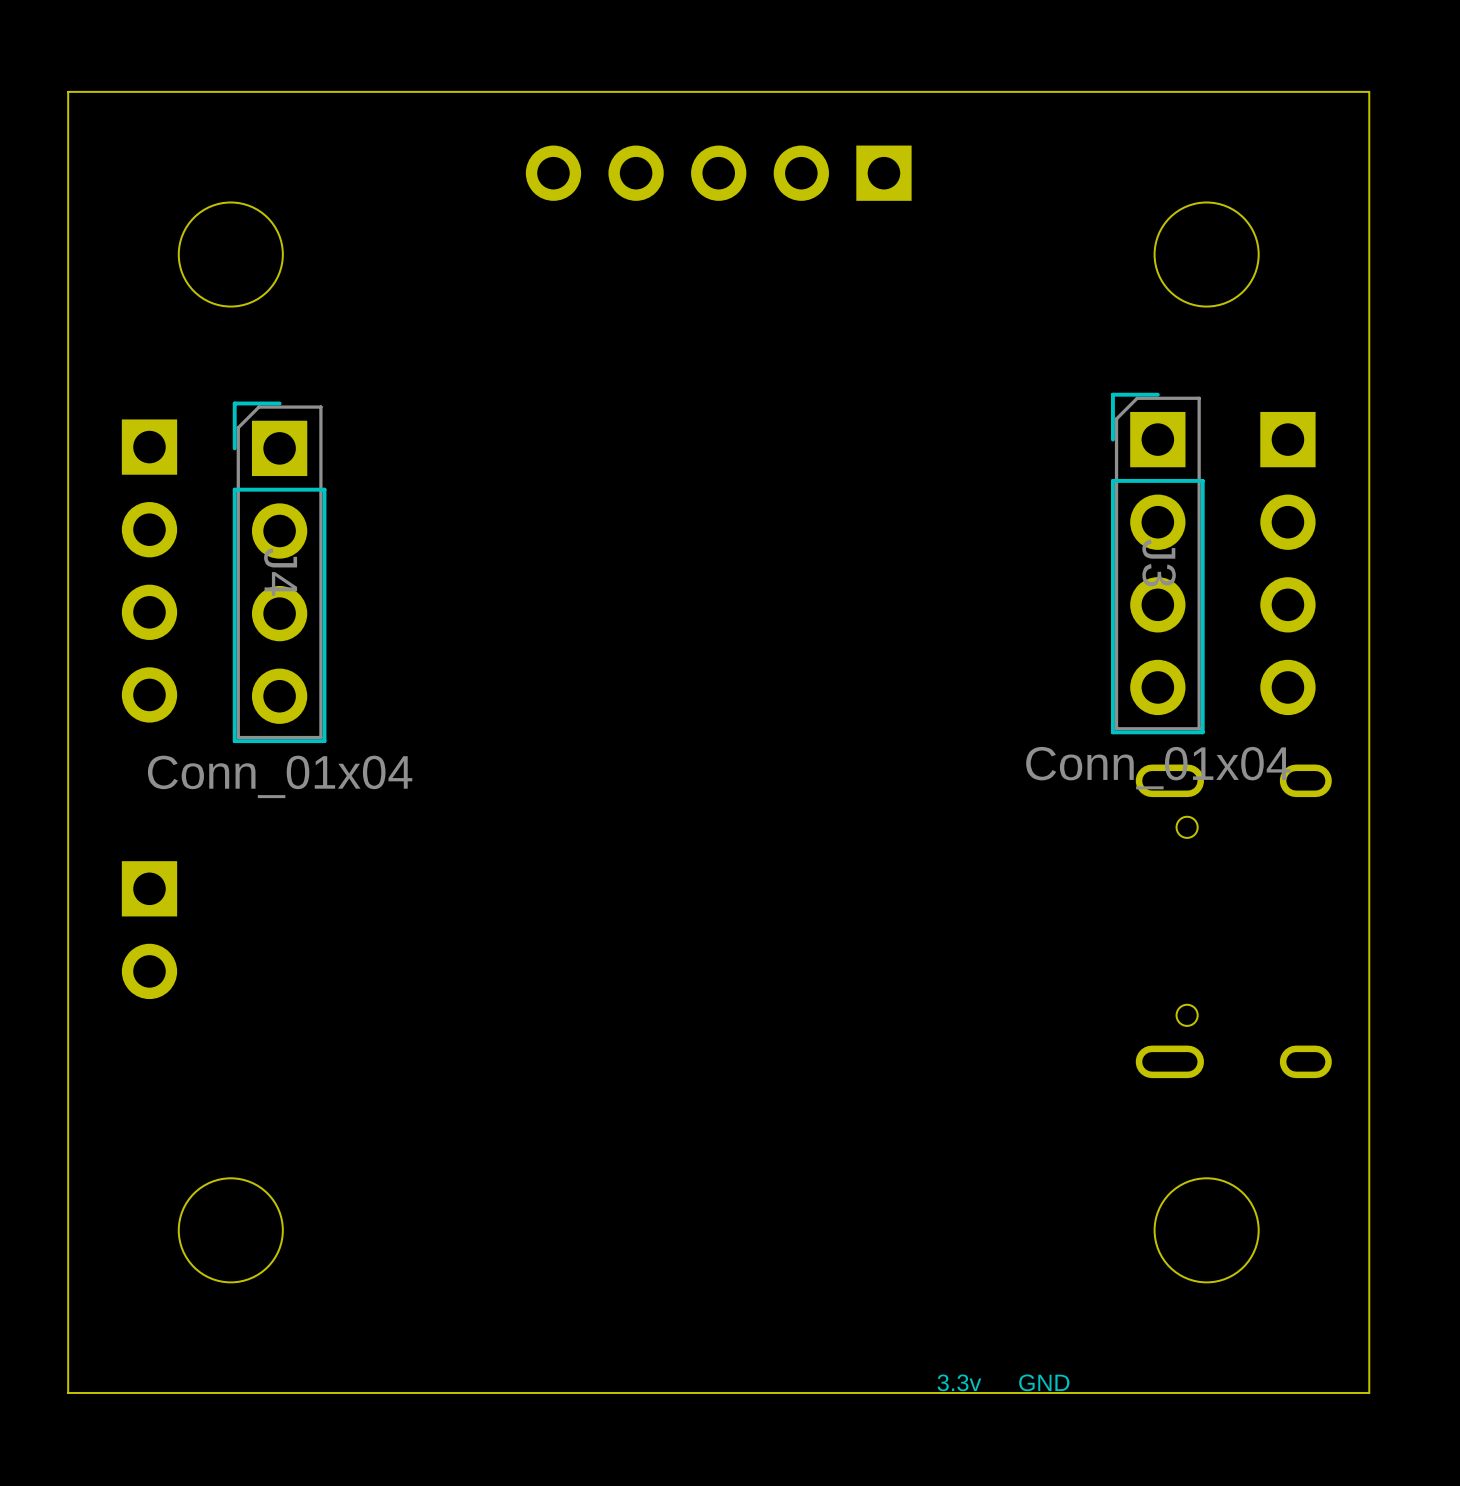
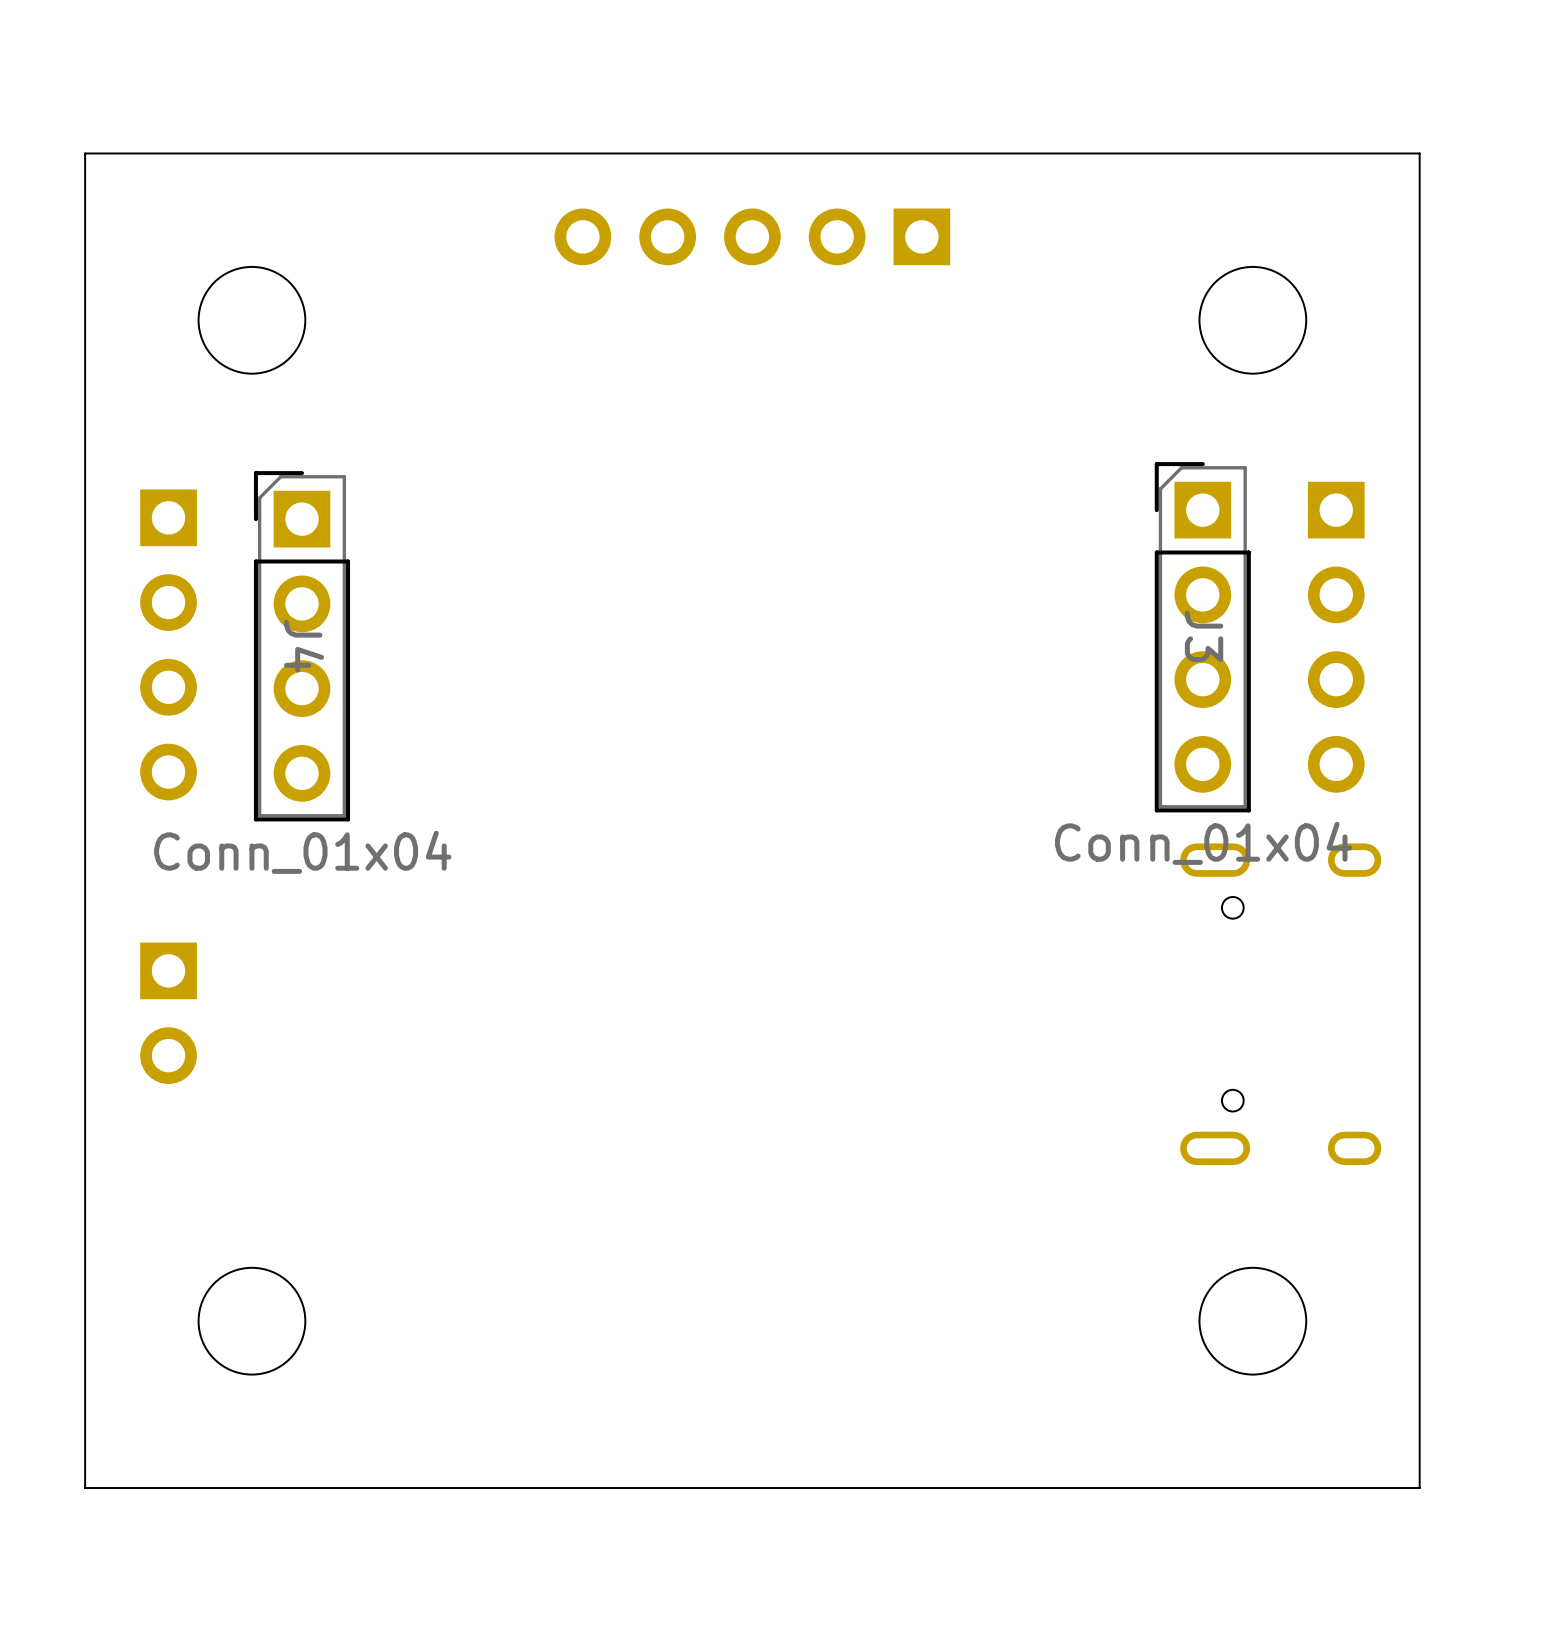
text: 3.3v (959, 1382) -> none
text: GND (1044, 1382) -> none

